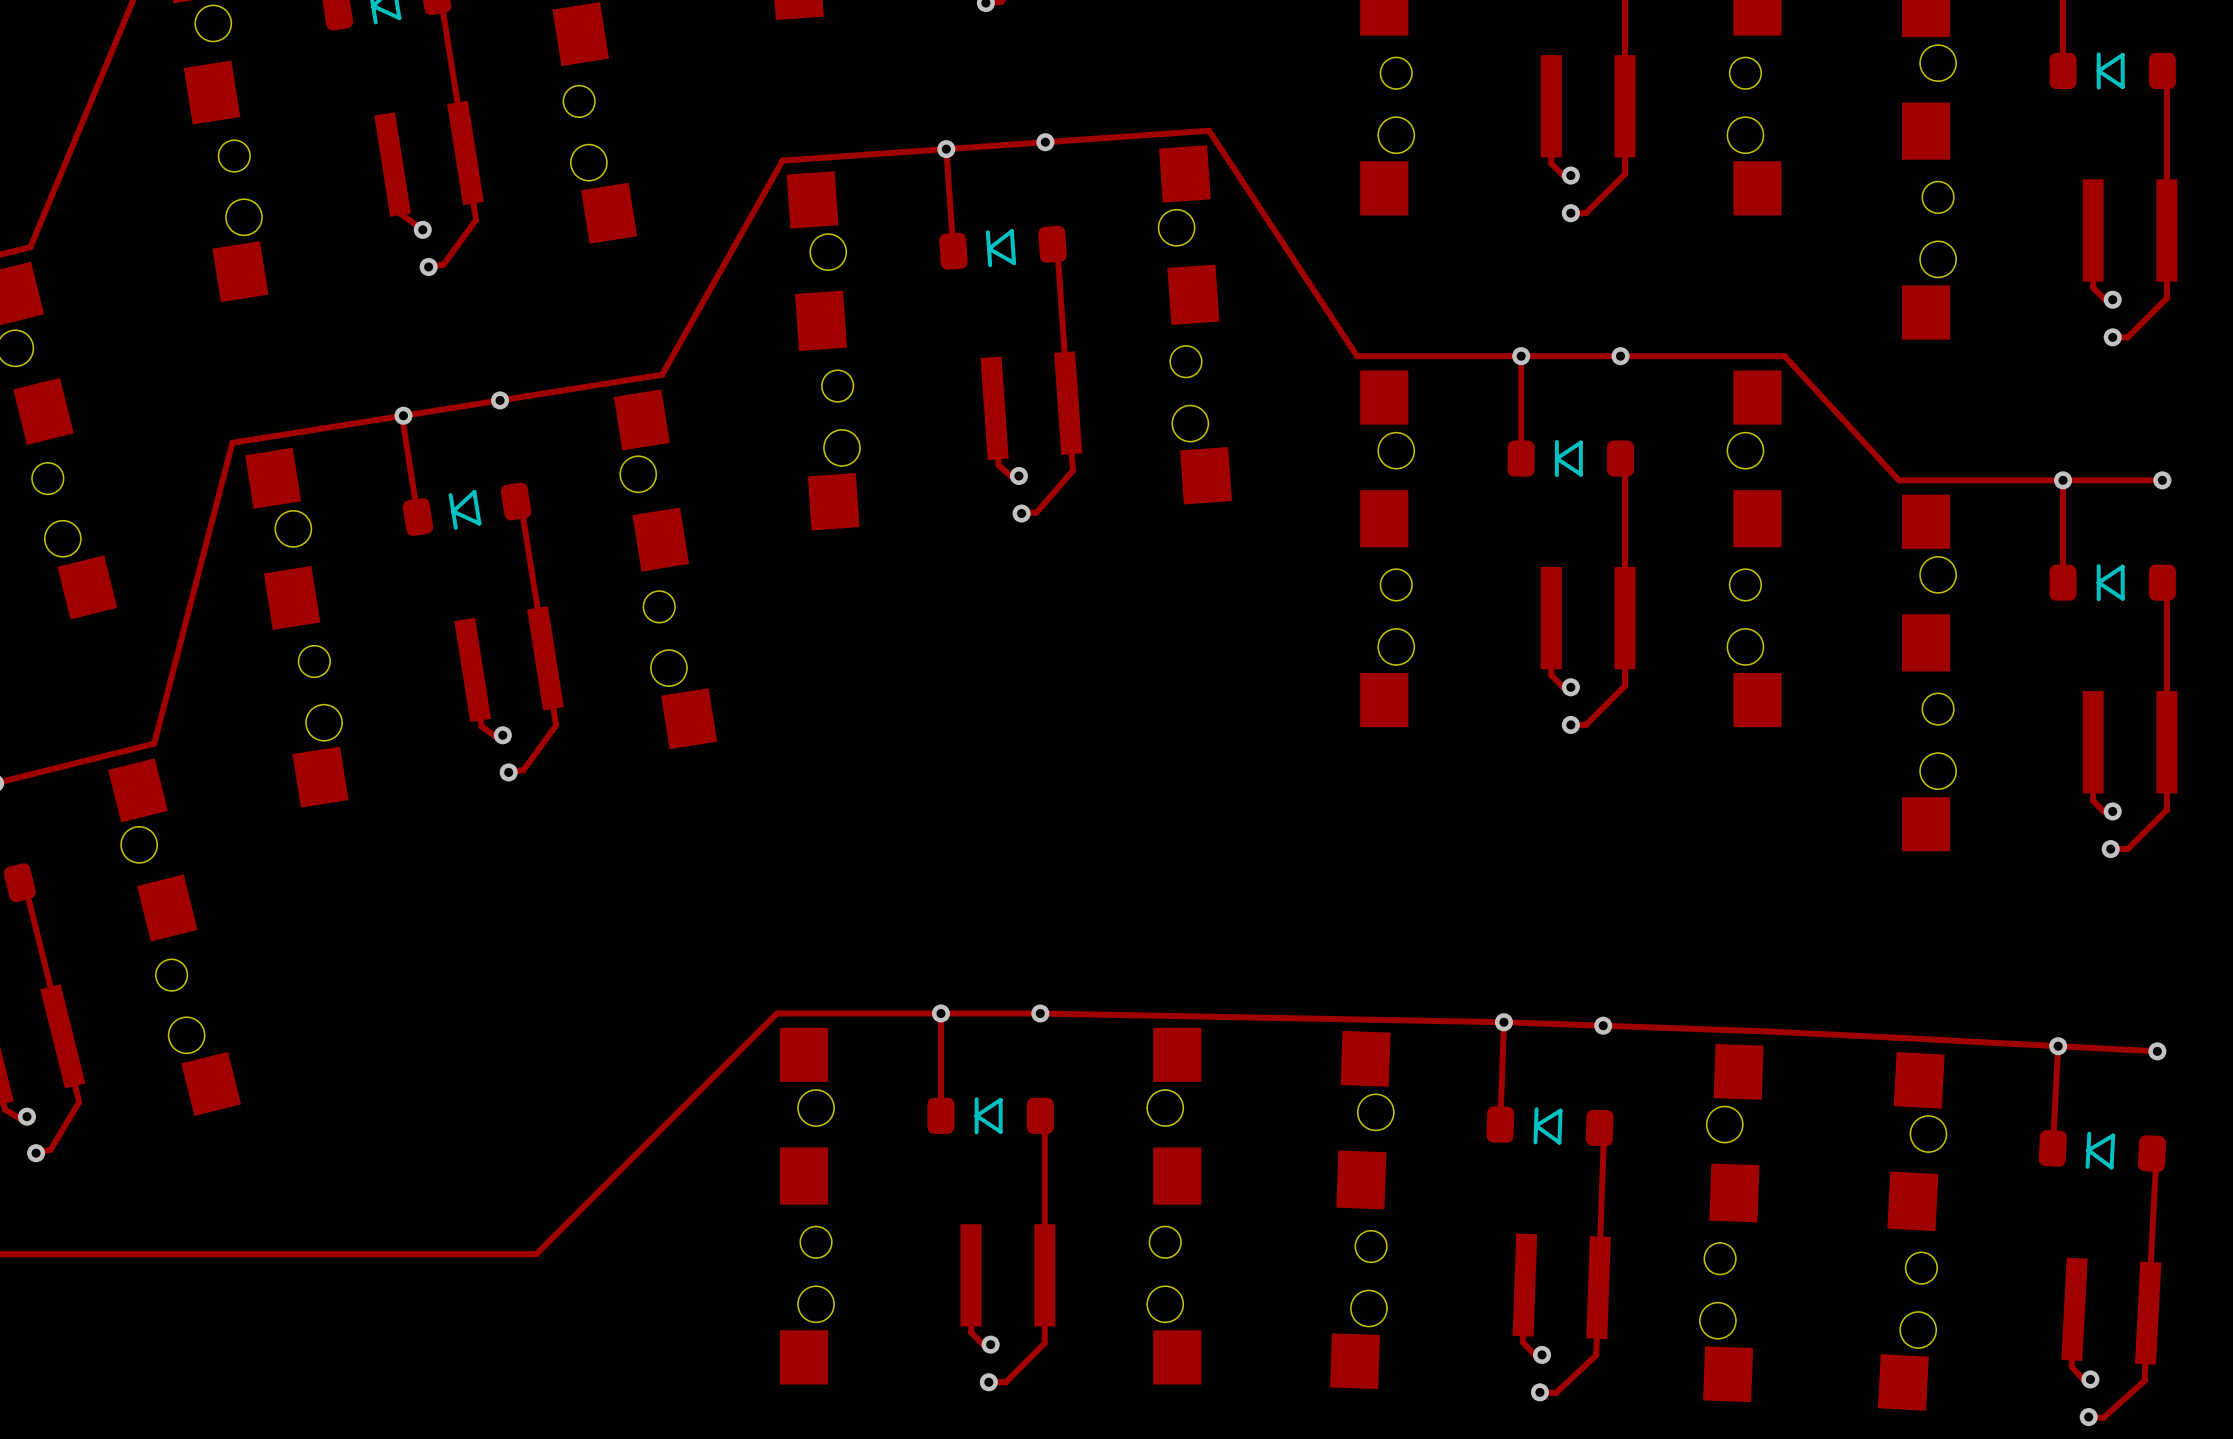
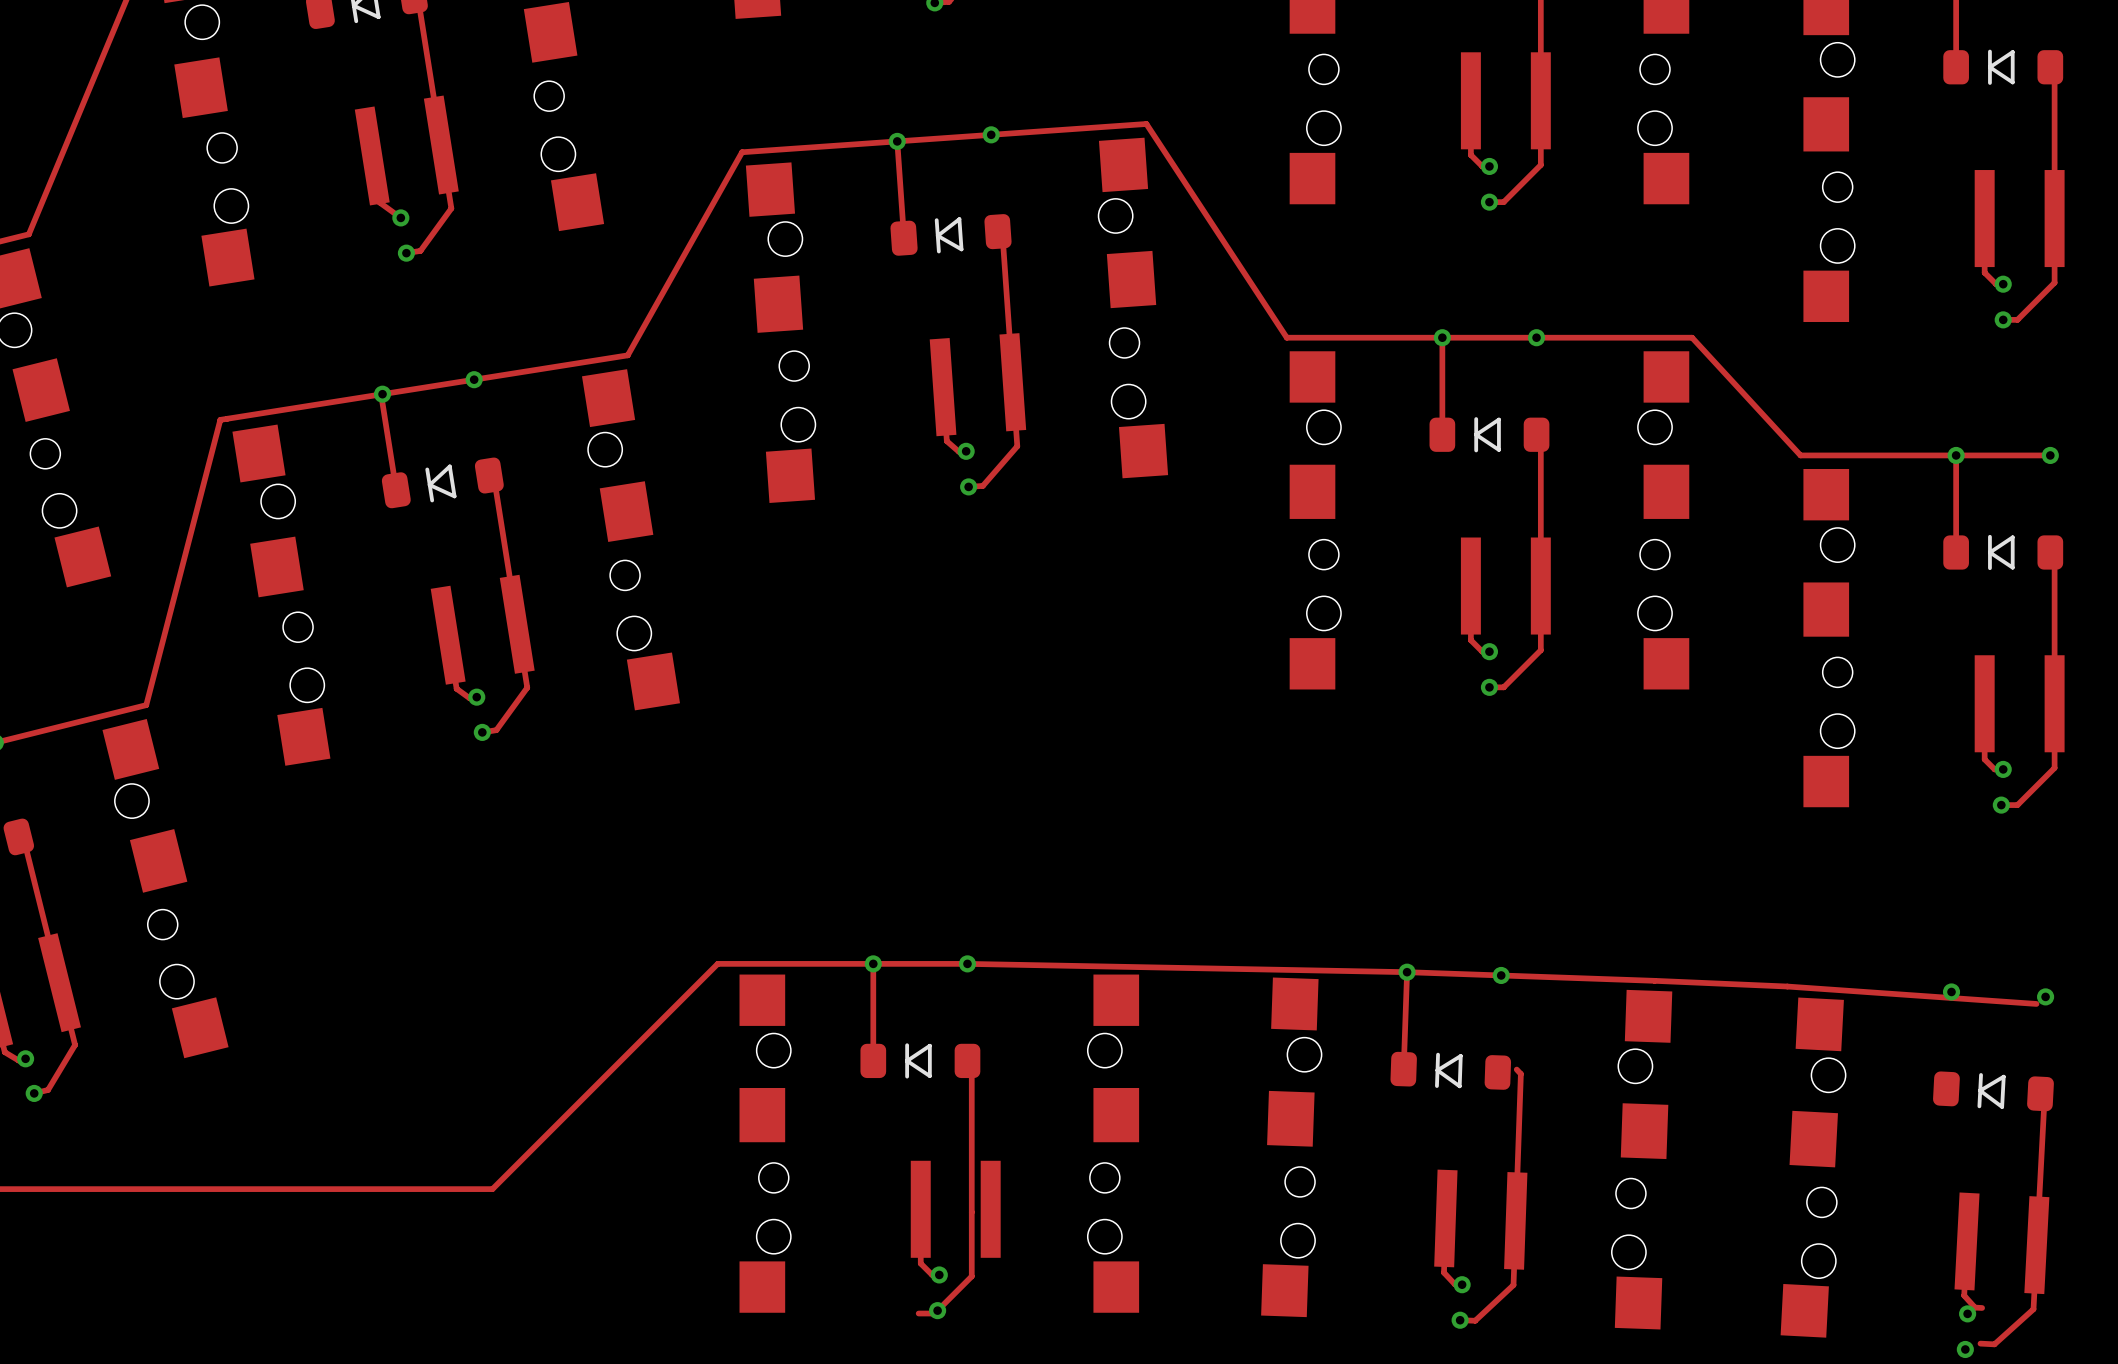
track: (940, 1013) (940, 1115) -> (873, 963) (873, 1060)
via position: (940, 1013) -> (873, 963)
via position: (1040, 1013) -> (967, 963)
track: (1503, 1022) (1040, 1013) (776, 1013) (536, 1254) (519, 1254) -> (1407, 972) (967, 963) (717, 963) (492, 1189)
track: (1503, 1022) (1500, 1124) -> (1407, 972) (1403, 1069)
track: (1503, 1022) (1765, 1031) (2157, 1051) -> none
via position: (1503, 1022) -> (1407, 972)
track: none -> (1407, 972) (1787, 986) (2036, 1003)
via position: (1603, 1025) -> (1501, 975)
track: (2058, 1046) (2052, 1148) -> none
part position: (990, 1115) -> (920, 1060)
track: (1040, 1115) (1044, 1120) (1044, 1343) (1005, 1382) (988, 1382) -> (967, 1060) (971, 1065) (971, 1276) (934, 1313) (918, 1313)
part position: (1550, 1126) -> (1450, 1070)
via position: (2090, 1379) -> (1967, 1313)
via position: (2088, 1417) -> (1965, 1349)

